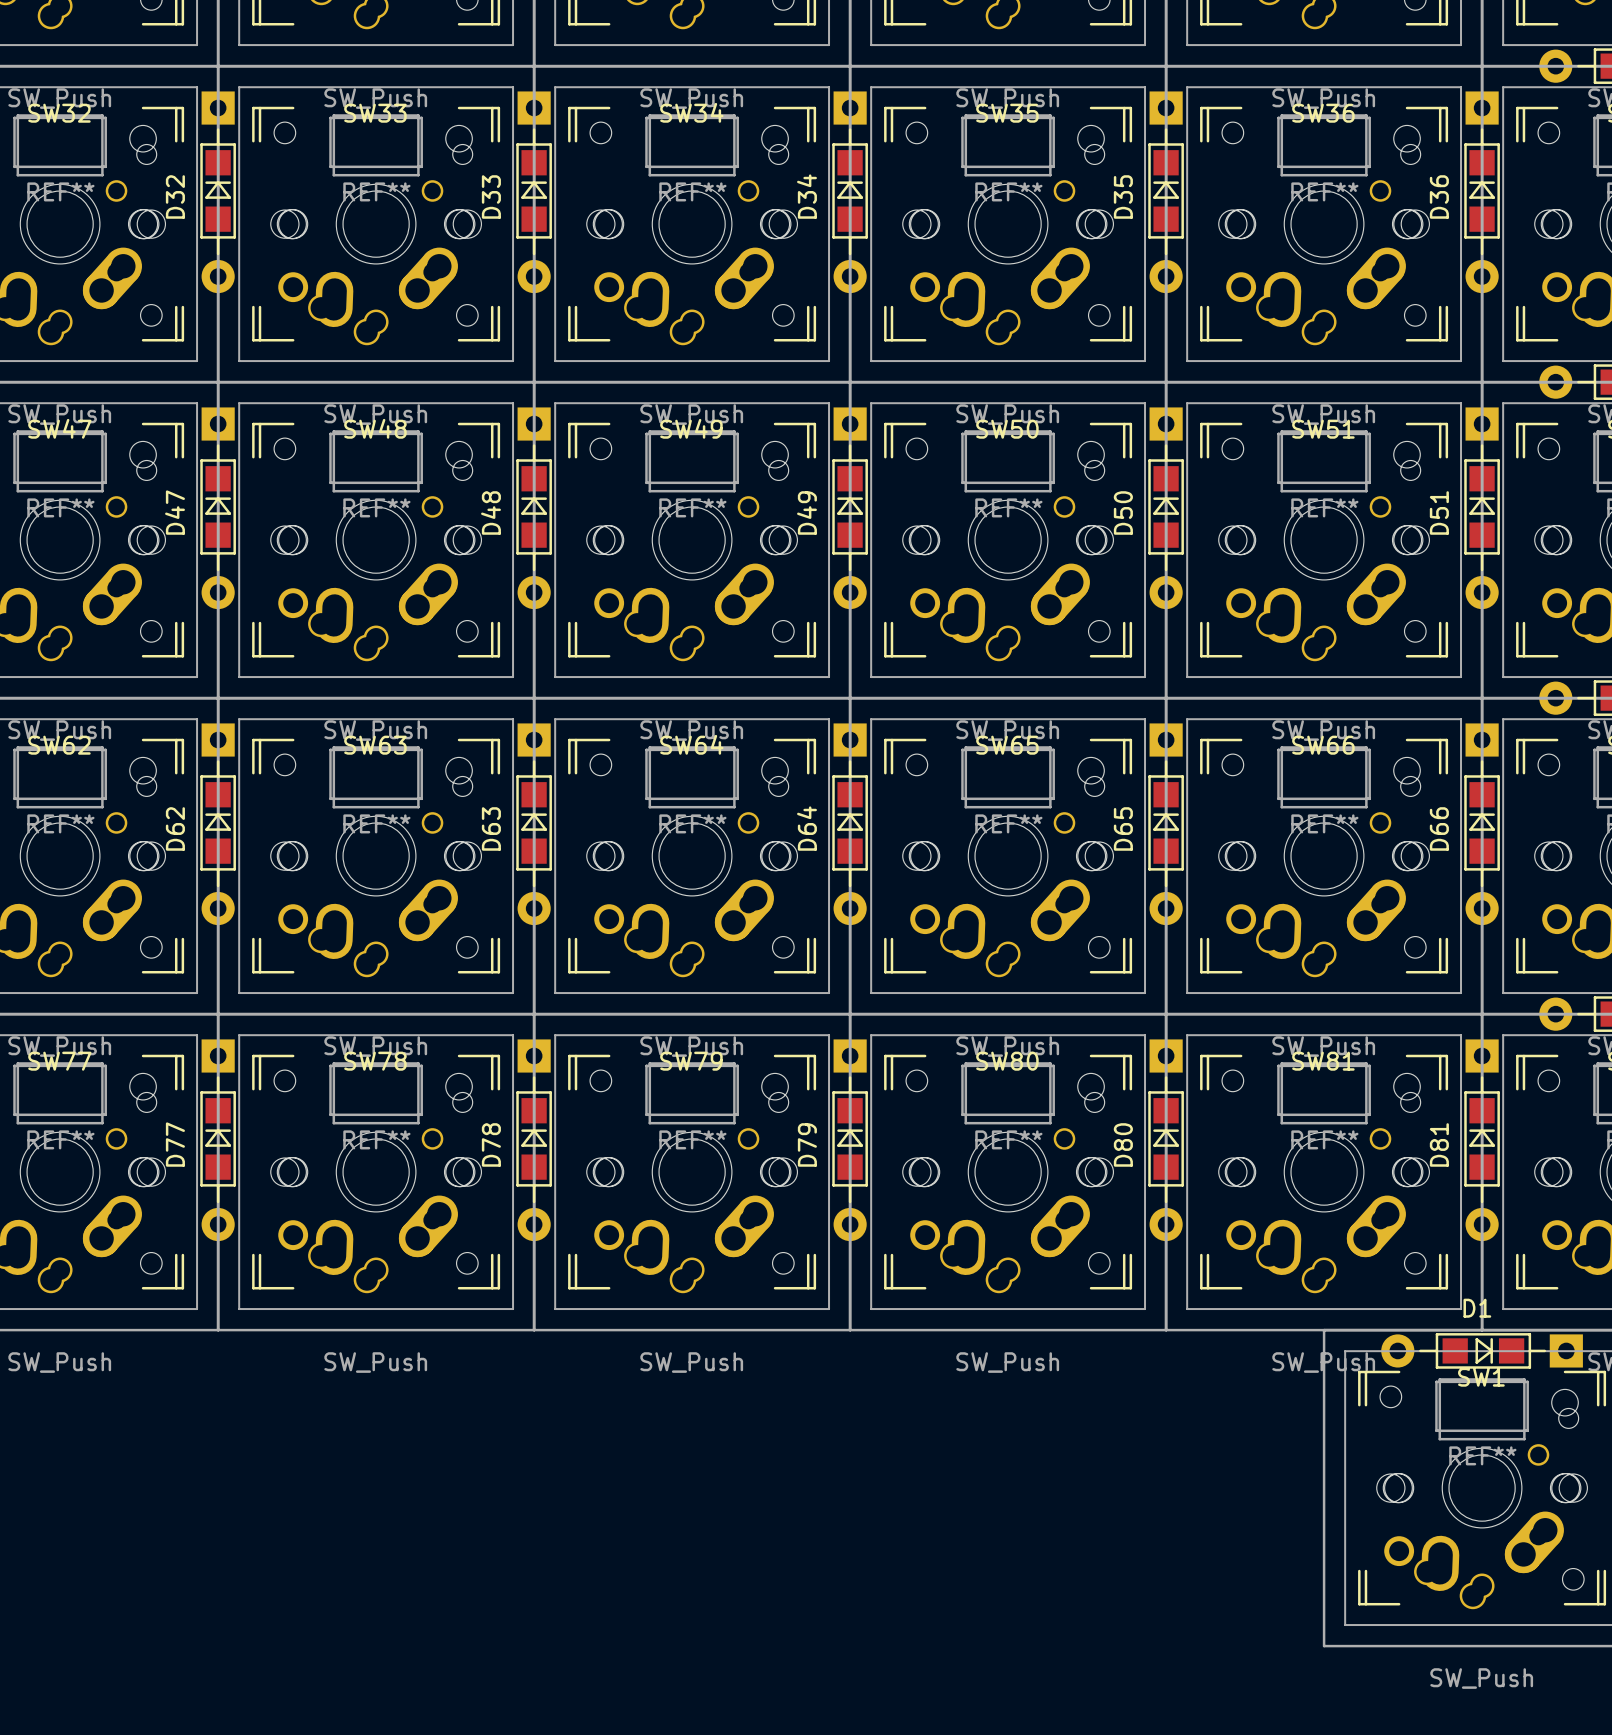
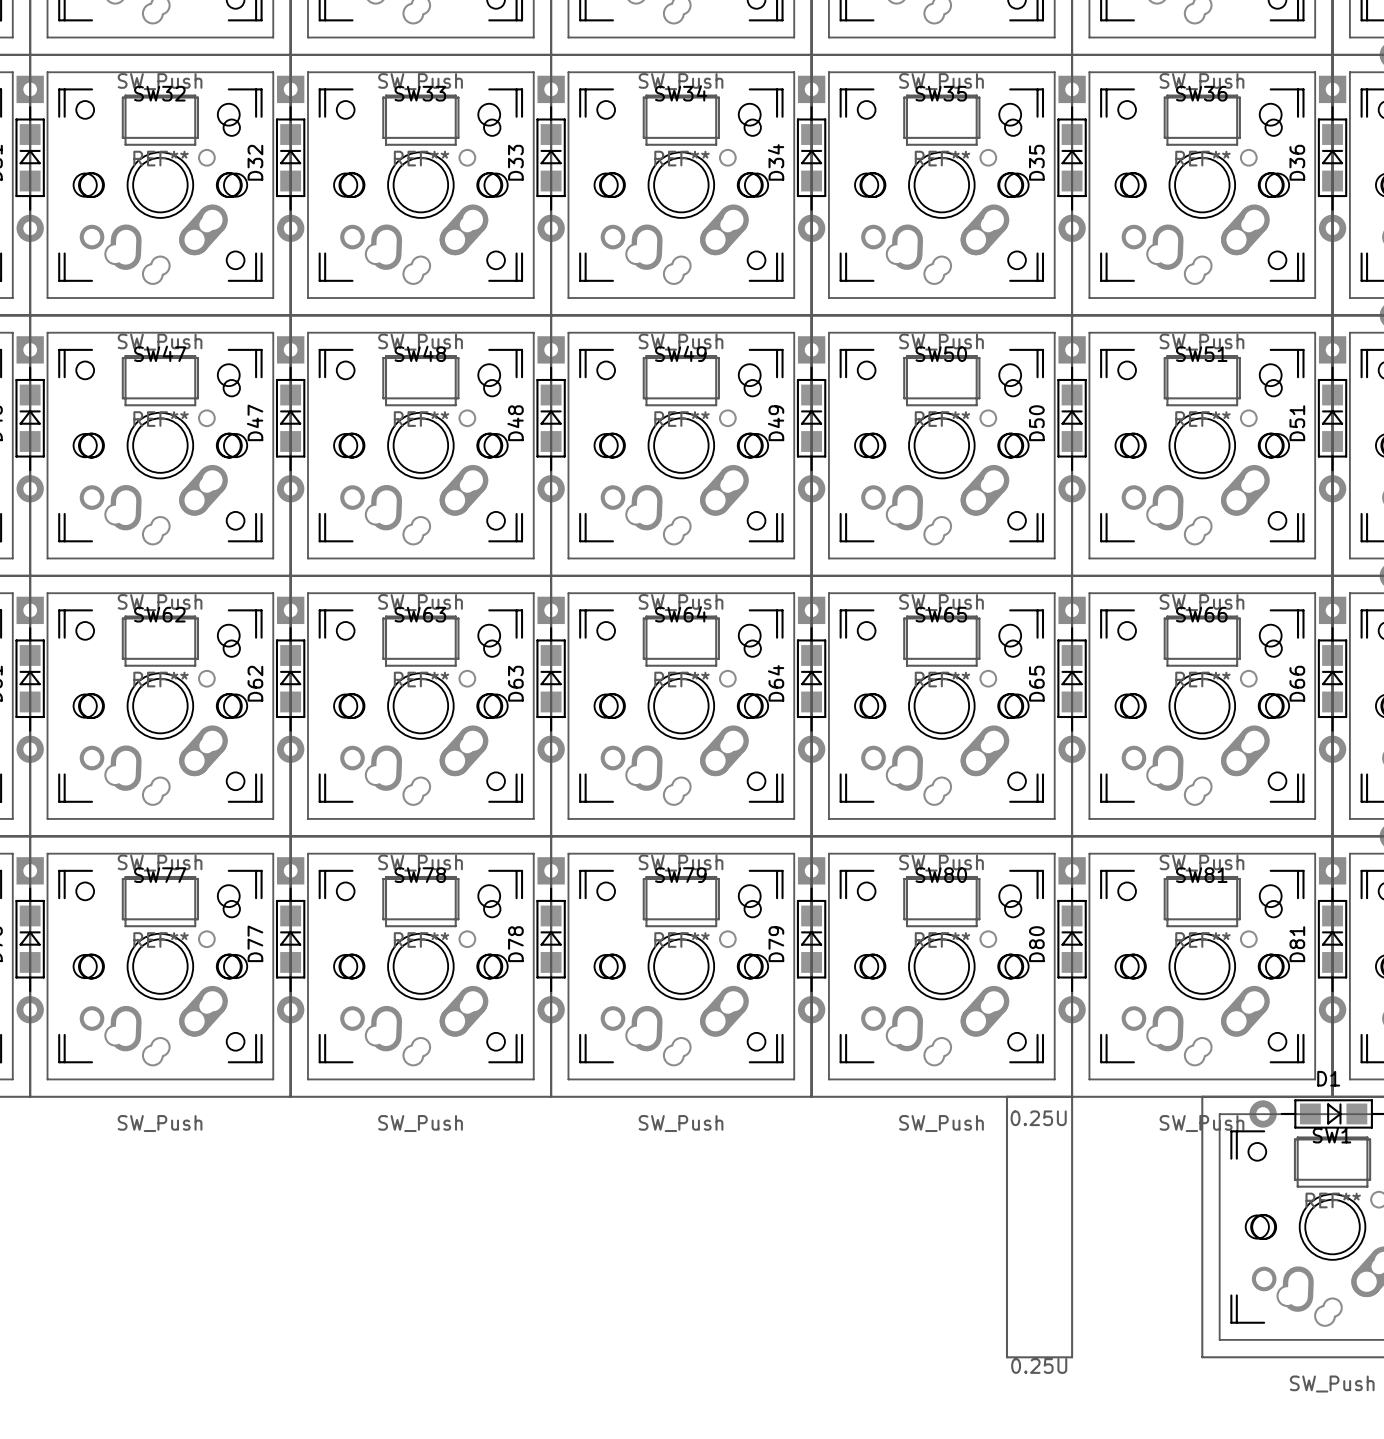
0.25U: none -> 0.25U (1039, 1227)

